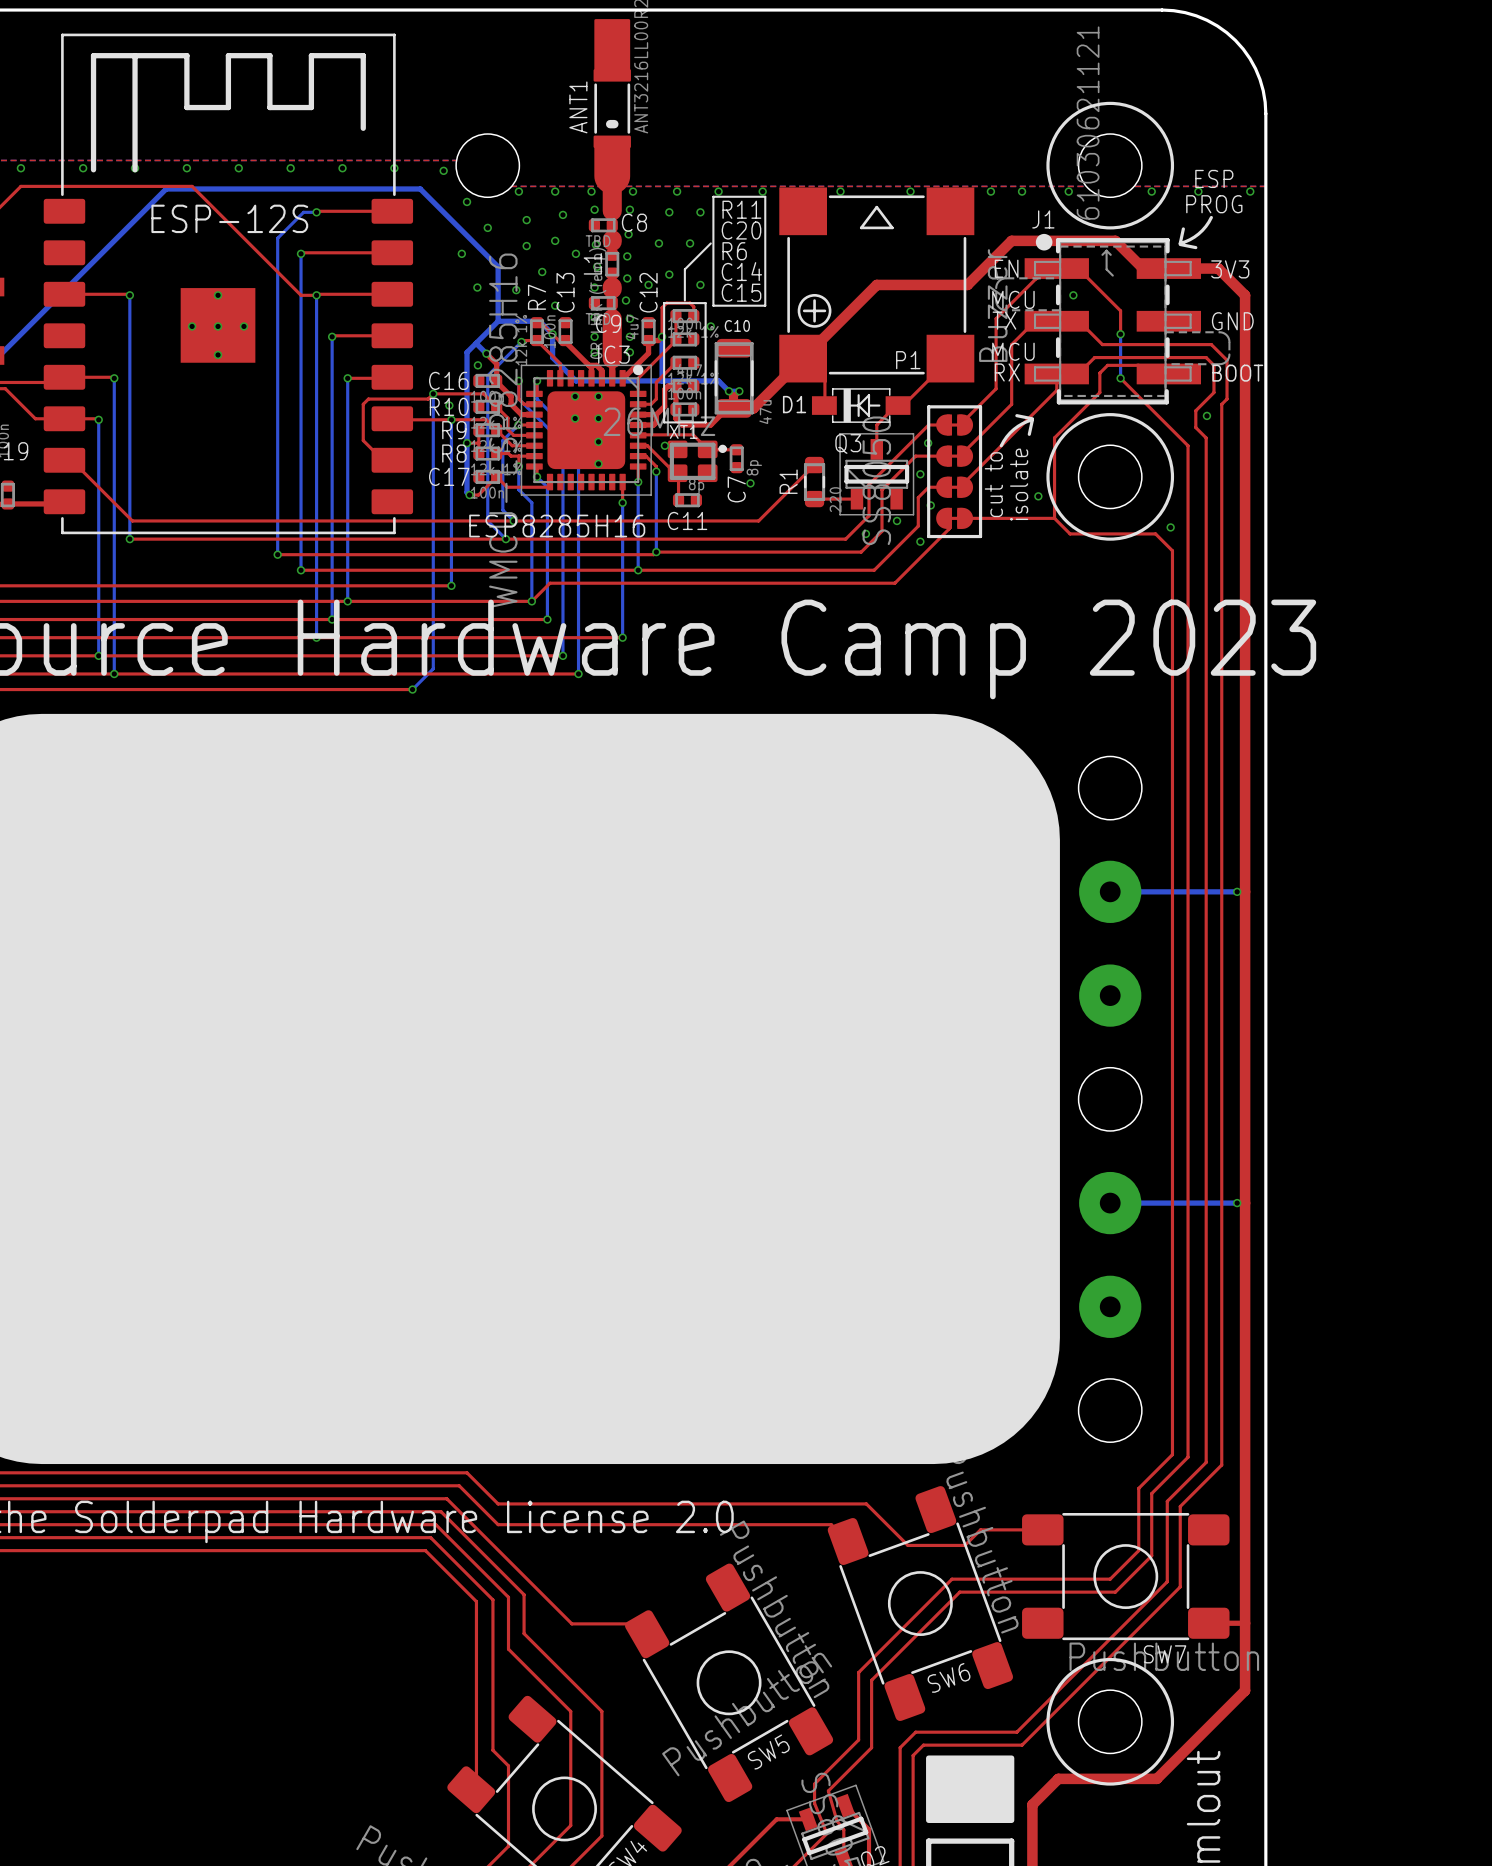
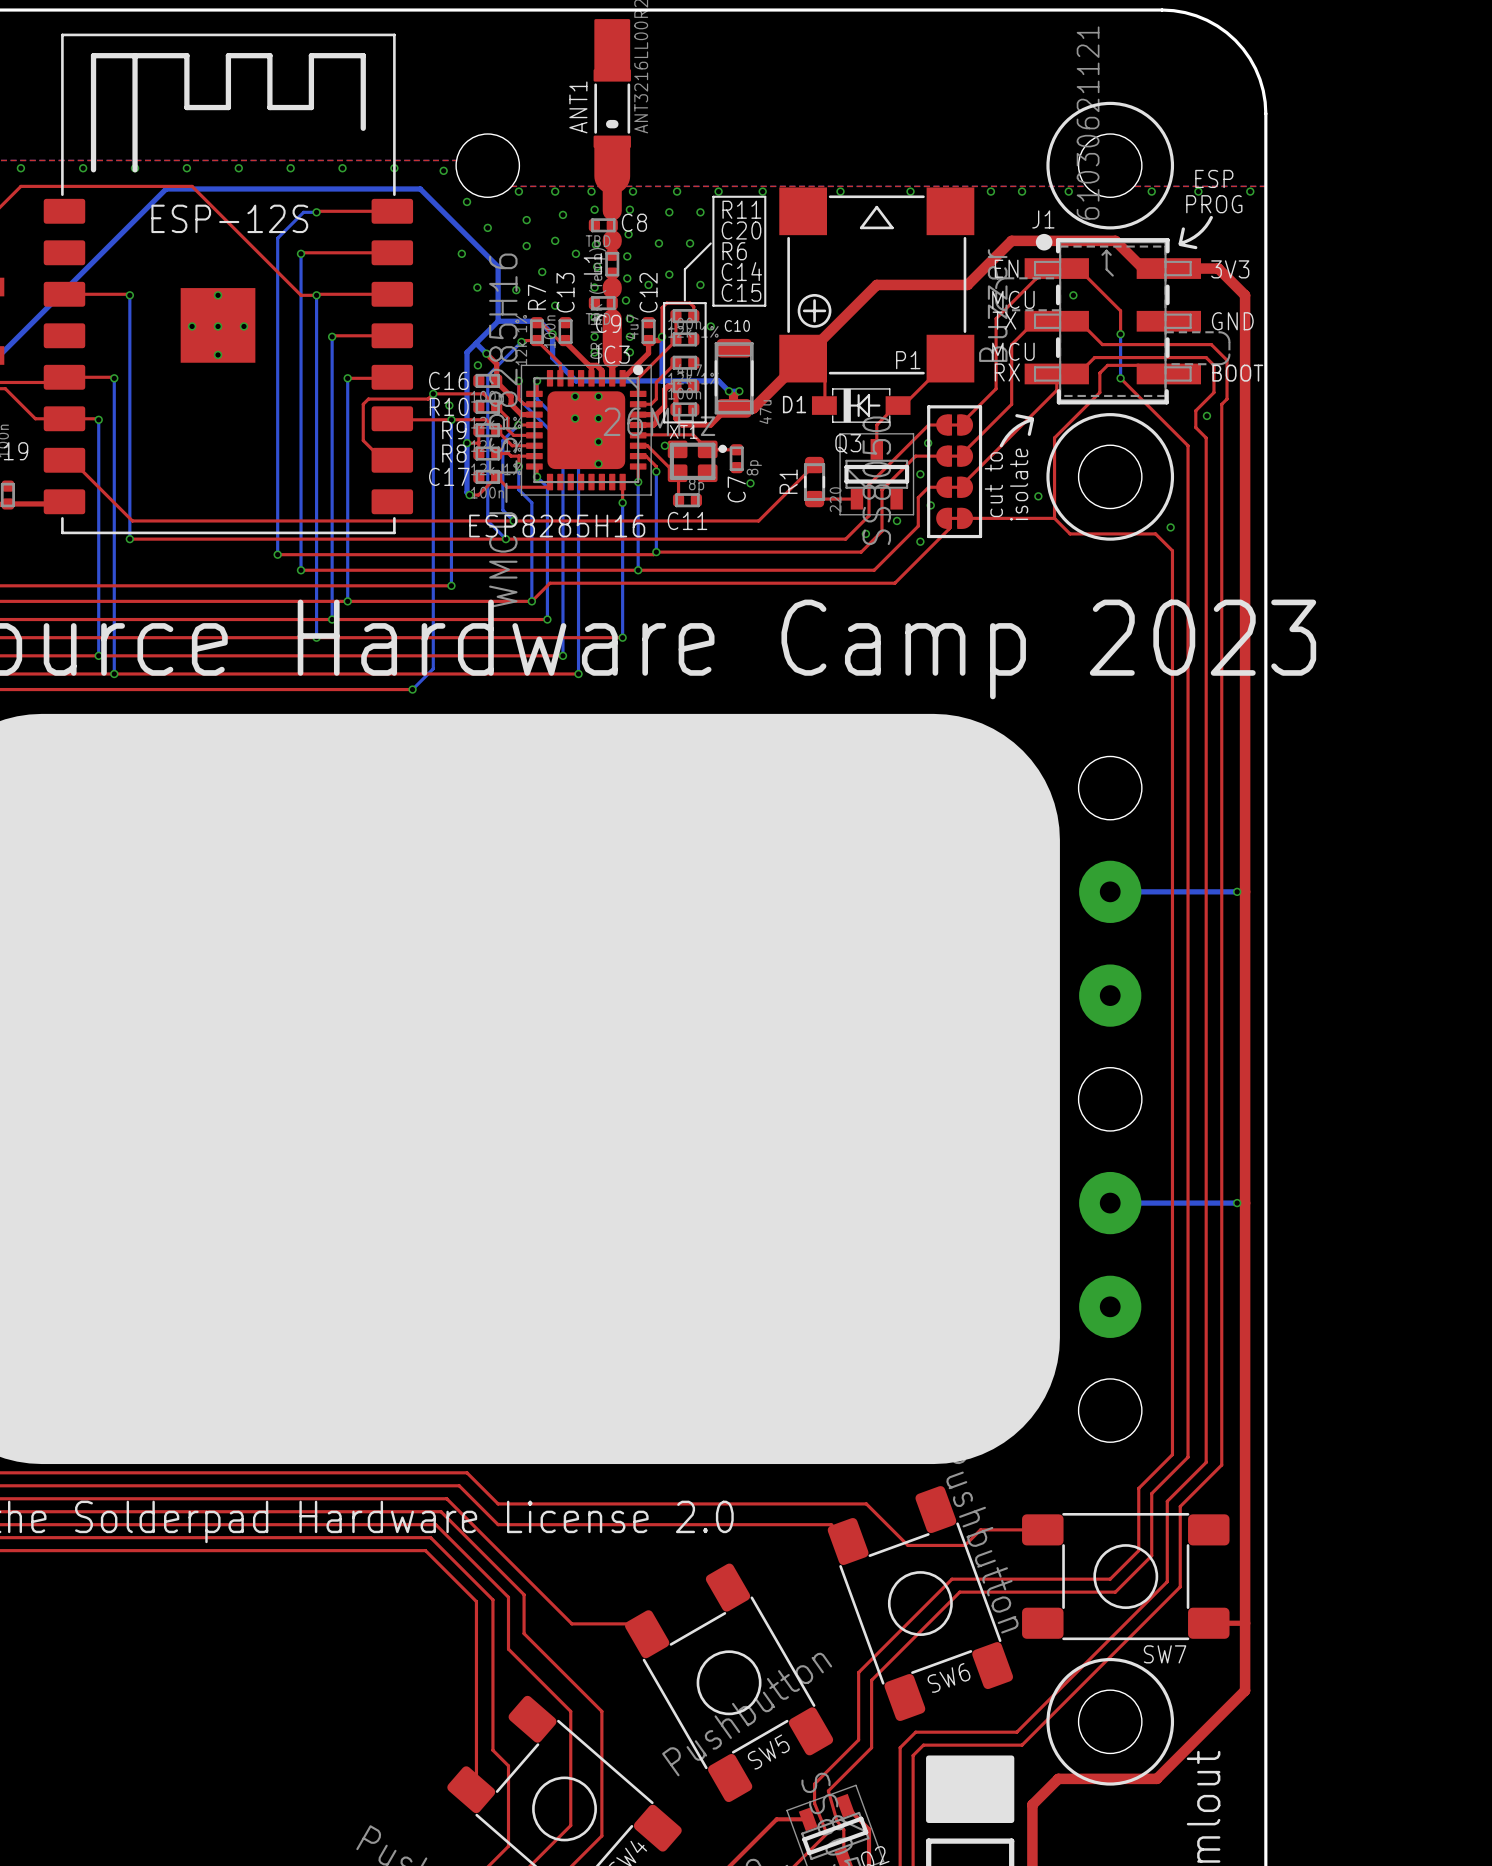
SW5 value: Pushbutton (774, 1609) -> none
SW7 value: Pushbutton (1164, 1656) -> none

